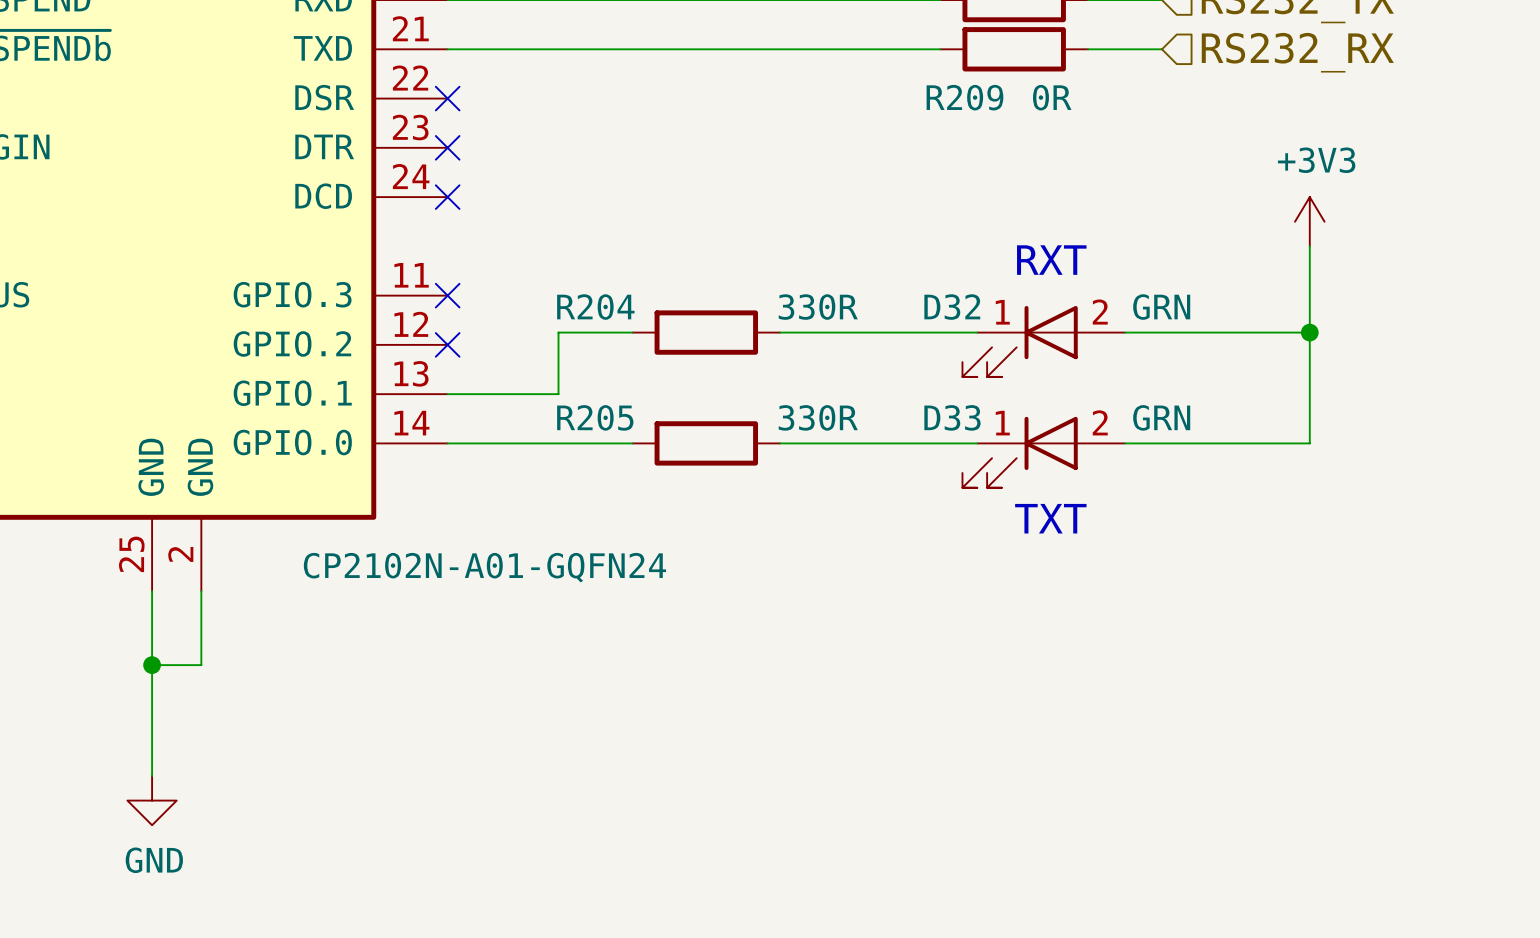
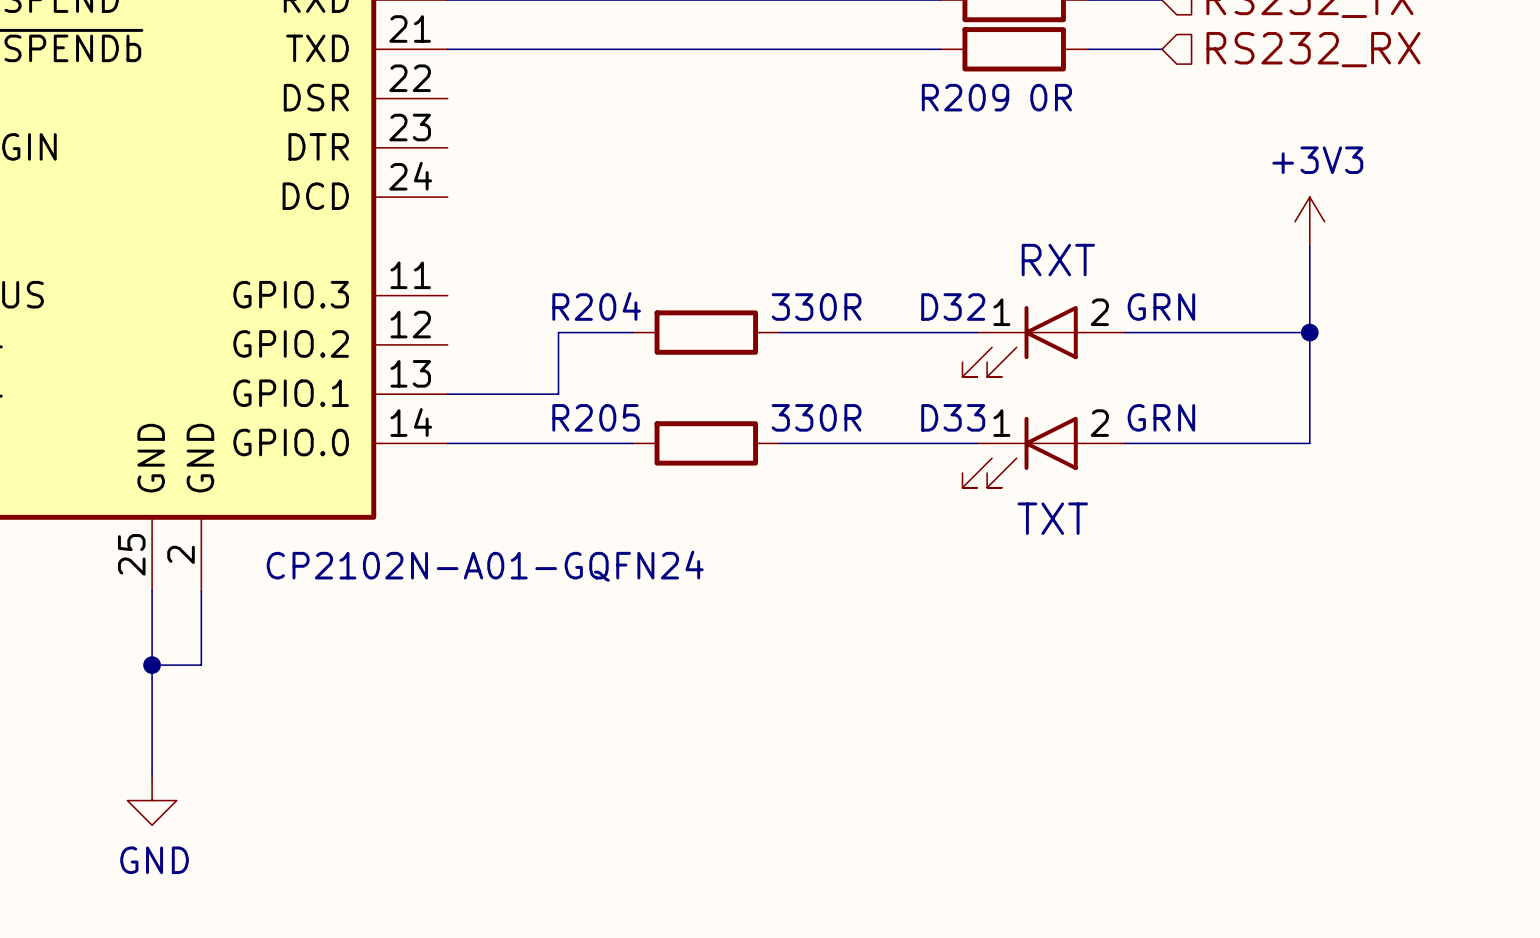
no-connect mark: (447, 98) -> none
no-connect mark: (447, 147) -> none
no-connect mark: (447, 197) -> none
no-connect mark: (447, 295) -> none
no-connect mark: (447, 344) -> none

